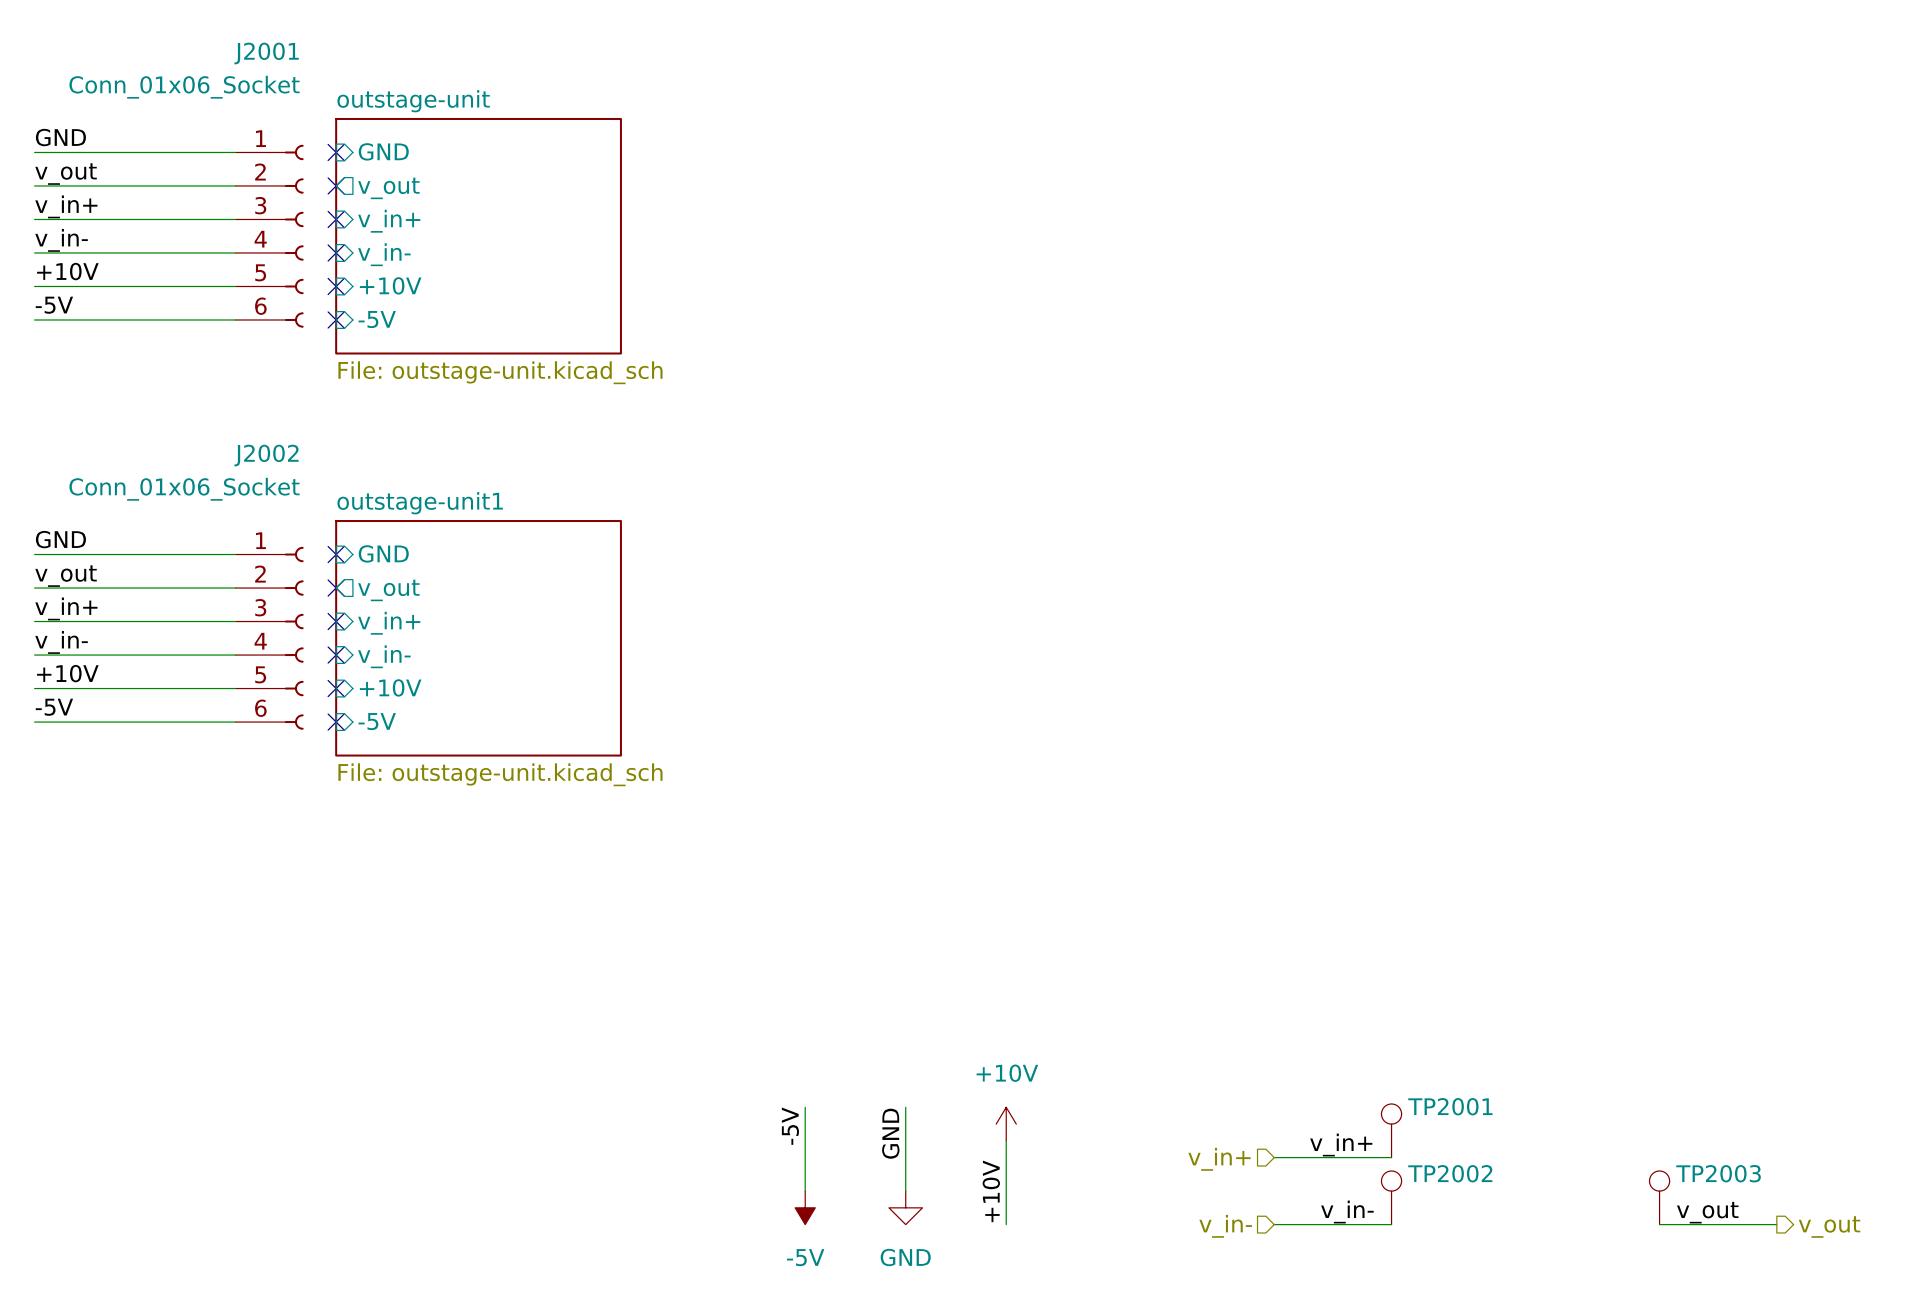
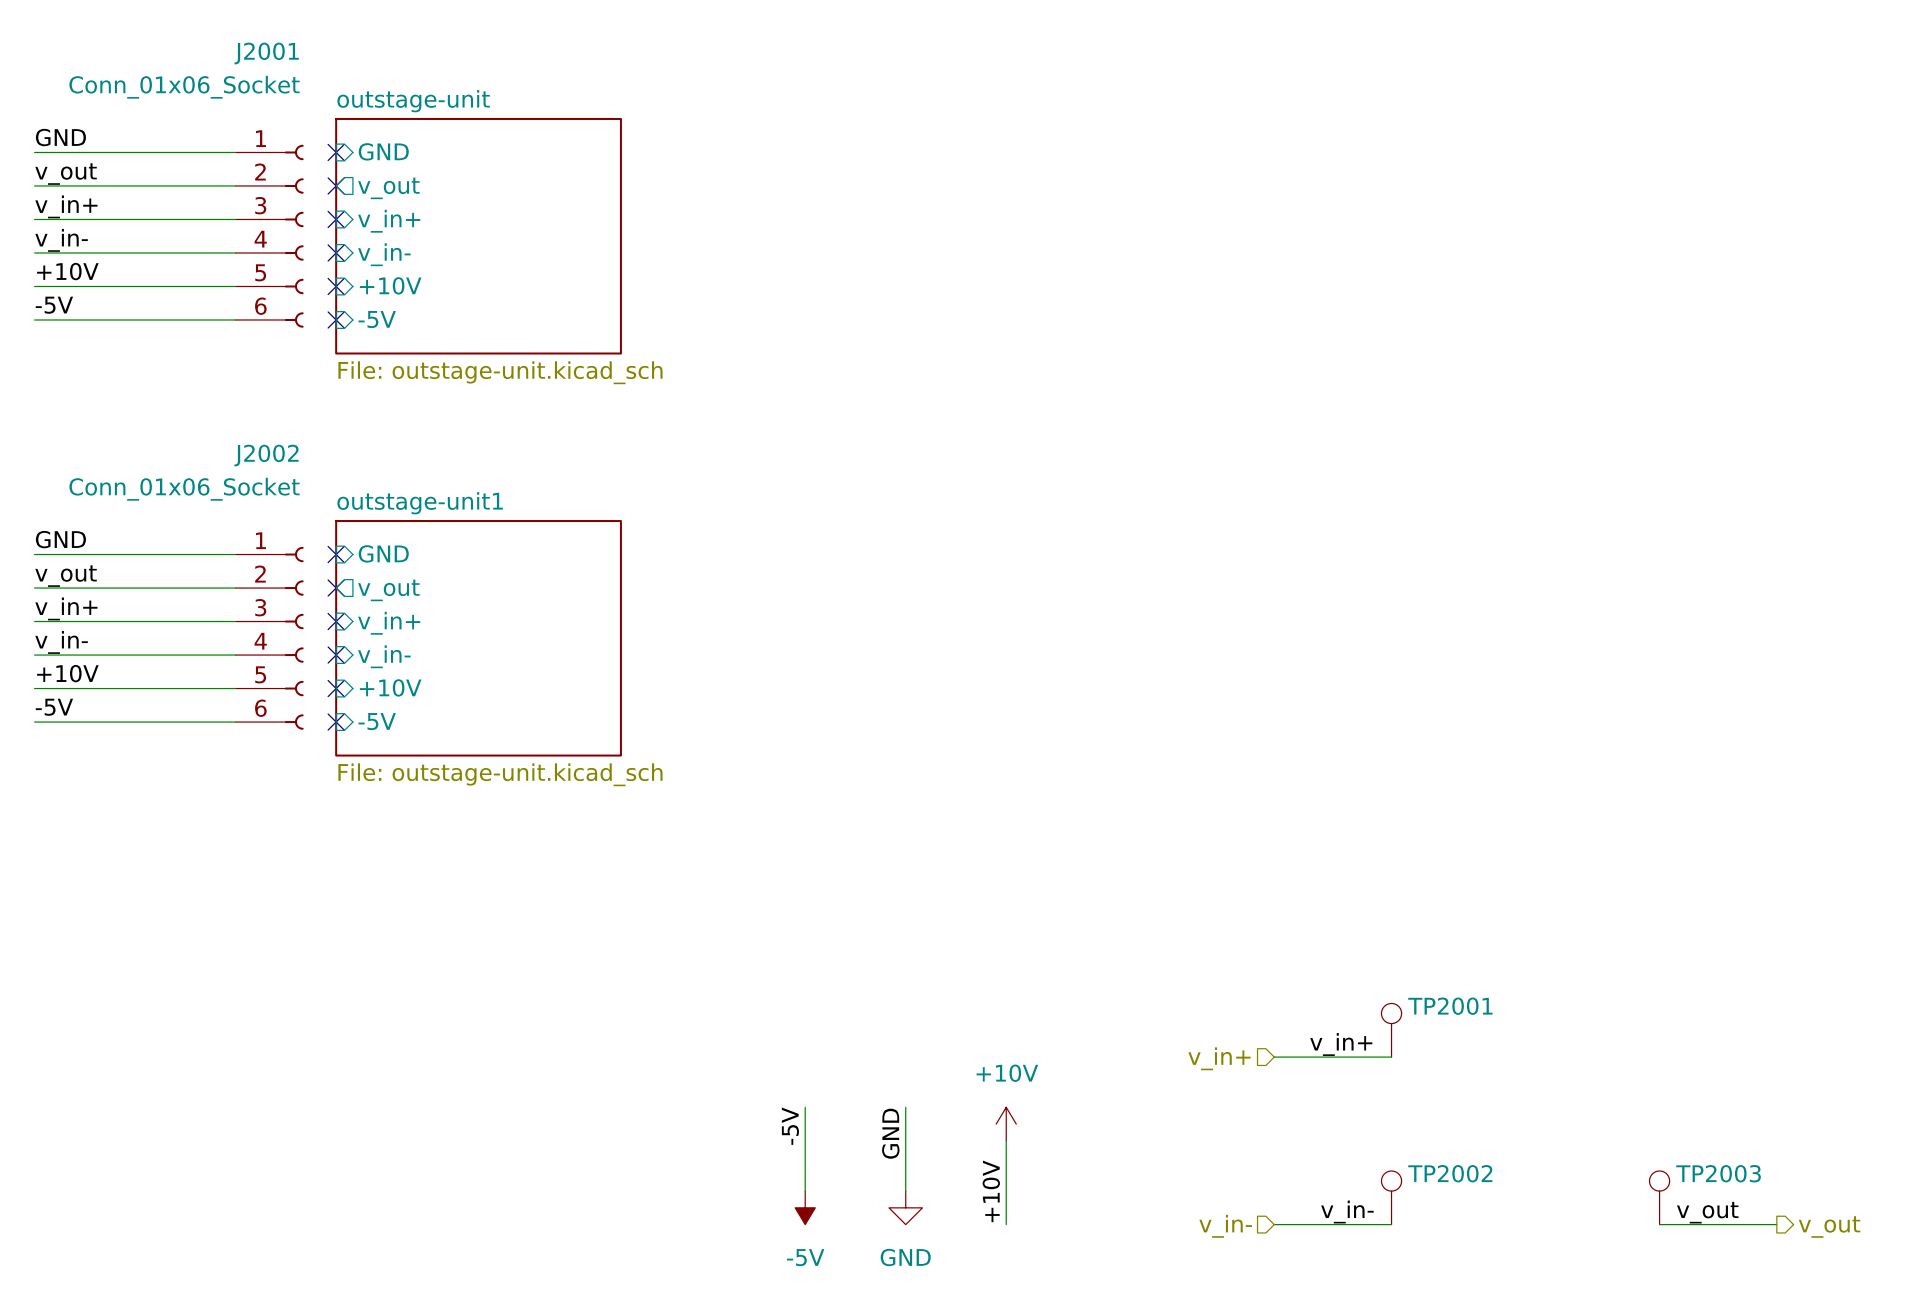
TP2001 position: (1391, 1130) -> (1391, 1030)
label position: v_in+ (1341, 1145) -> v_in+ (1341, 1044)
wire: (1274, 1157) (1391, 1157) -> (1274, 1057) (1391, 1057)
hierarchical label position: v_in+ (1219, 1159) -> v_in+ (1219, 1058)

